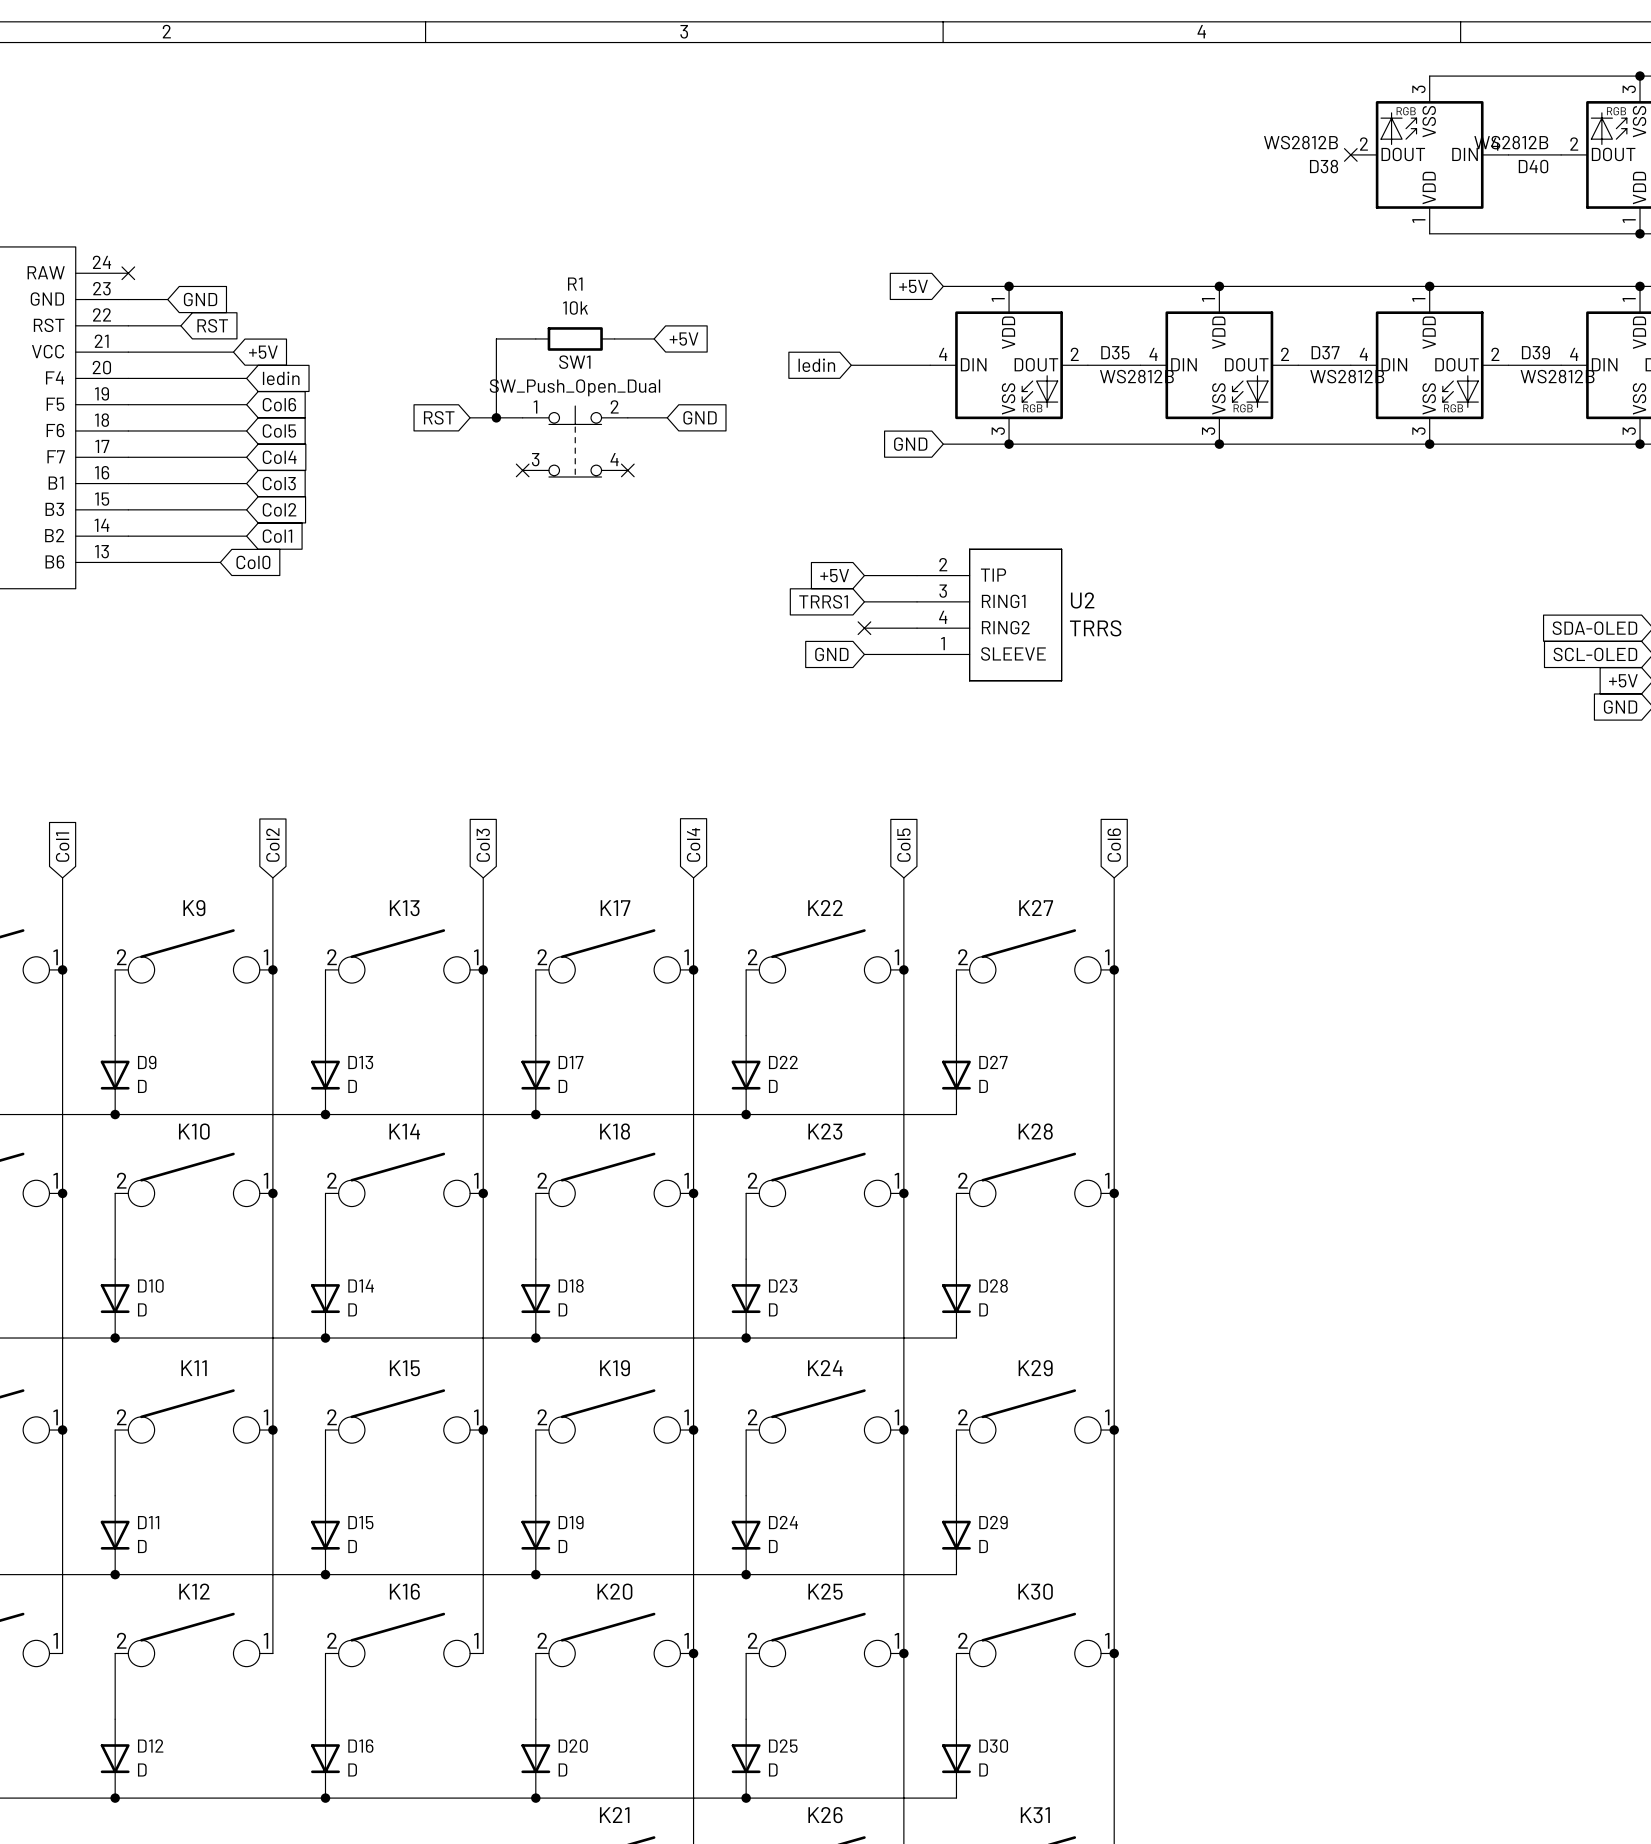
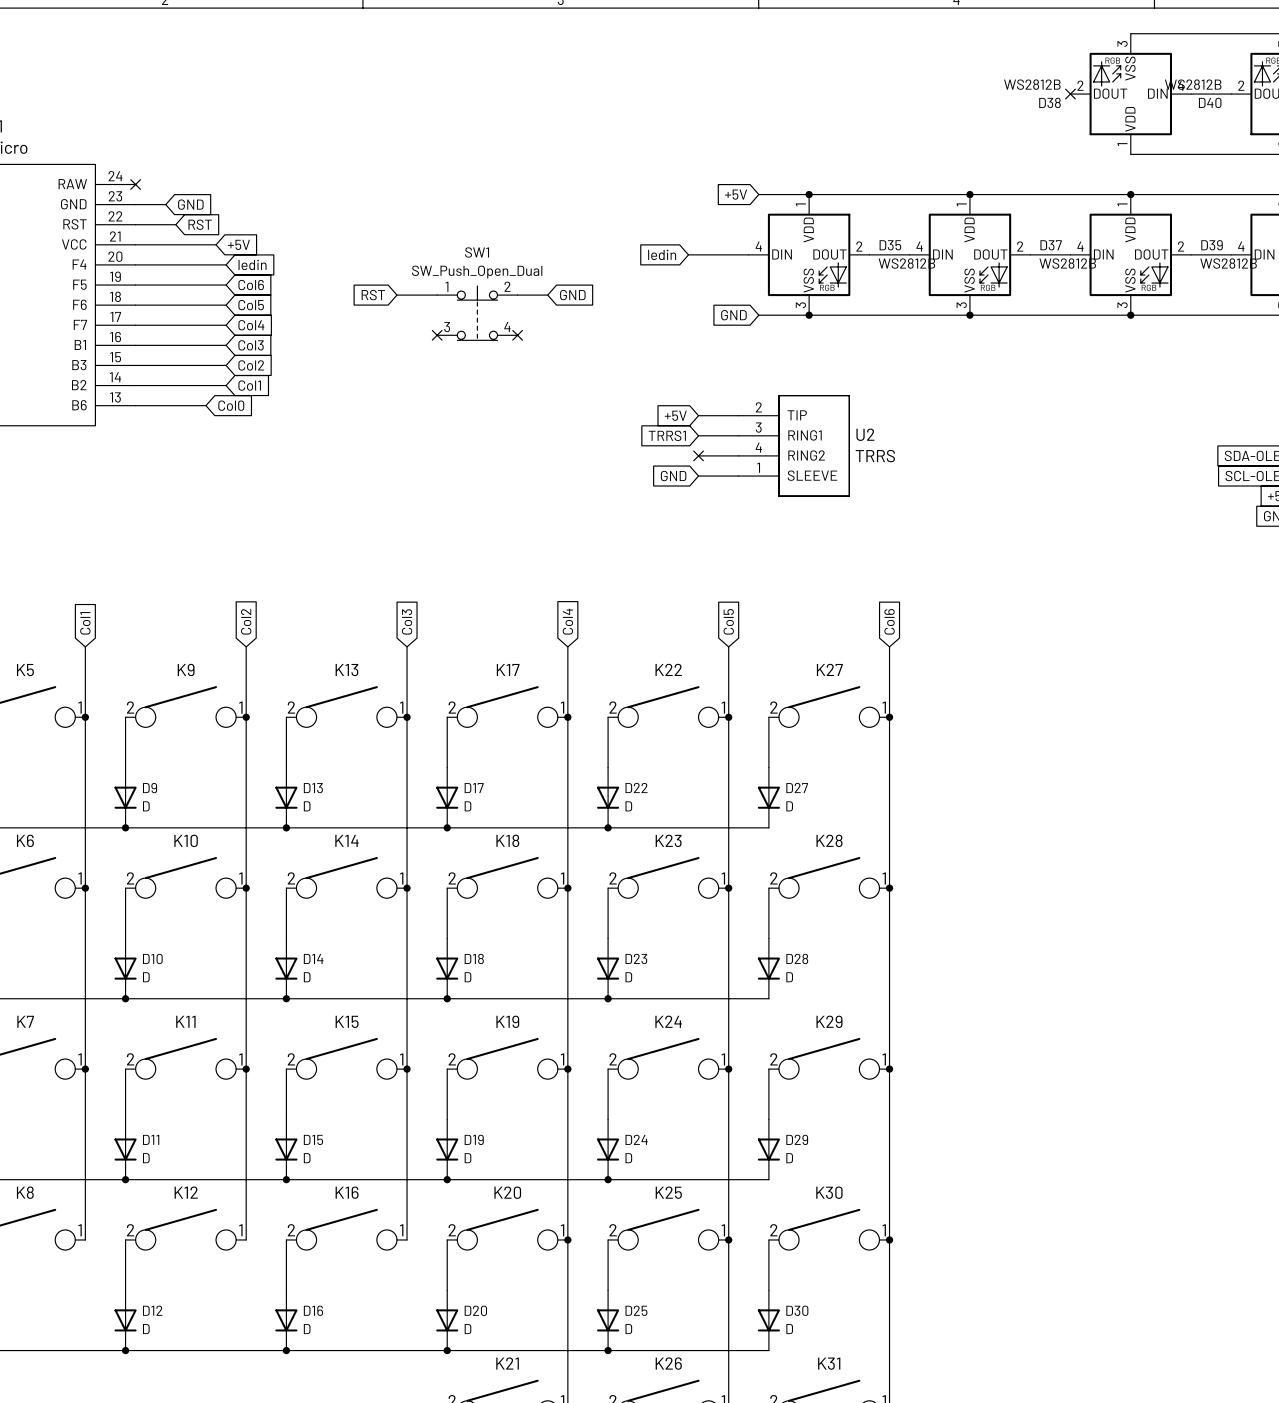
wire: (535, 338) (496, 338) (496, 417) -> none
R1: 10k (575, 338) -> none
wire: (614, 338) (654, 338) -> none
global label: +5V (684, 339) -> none
junction: (496, 417) -> none

